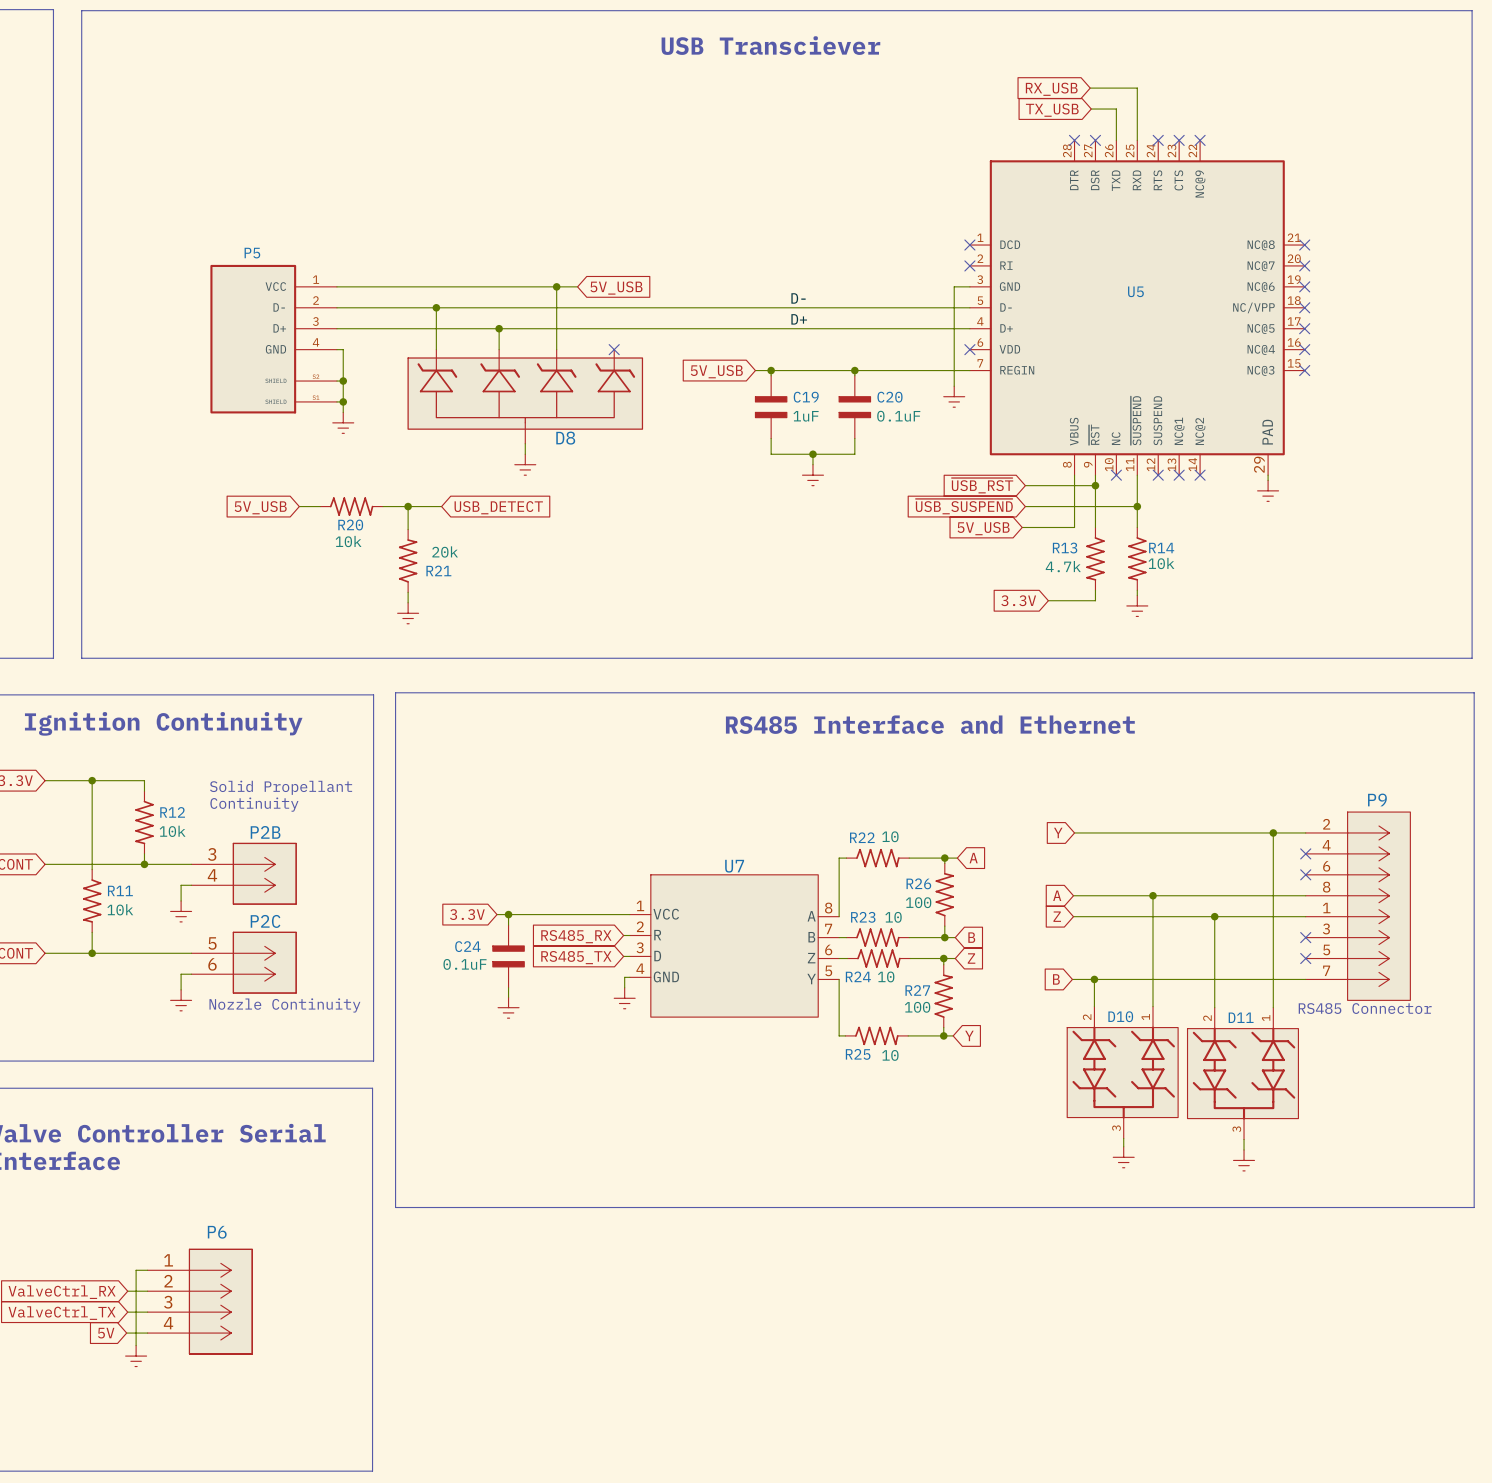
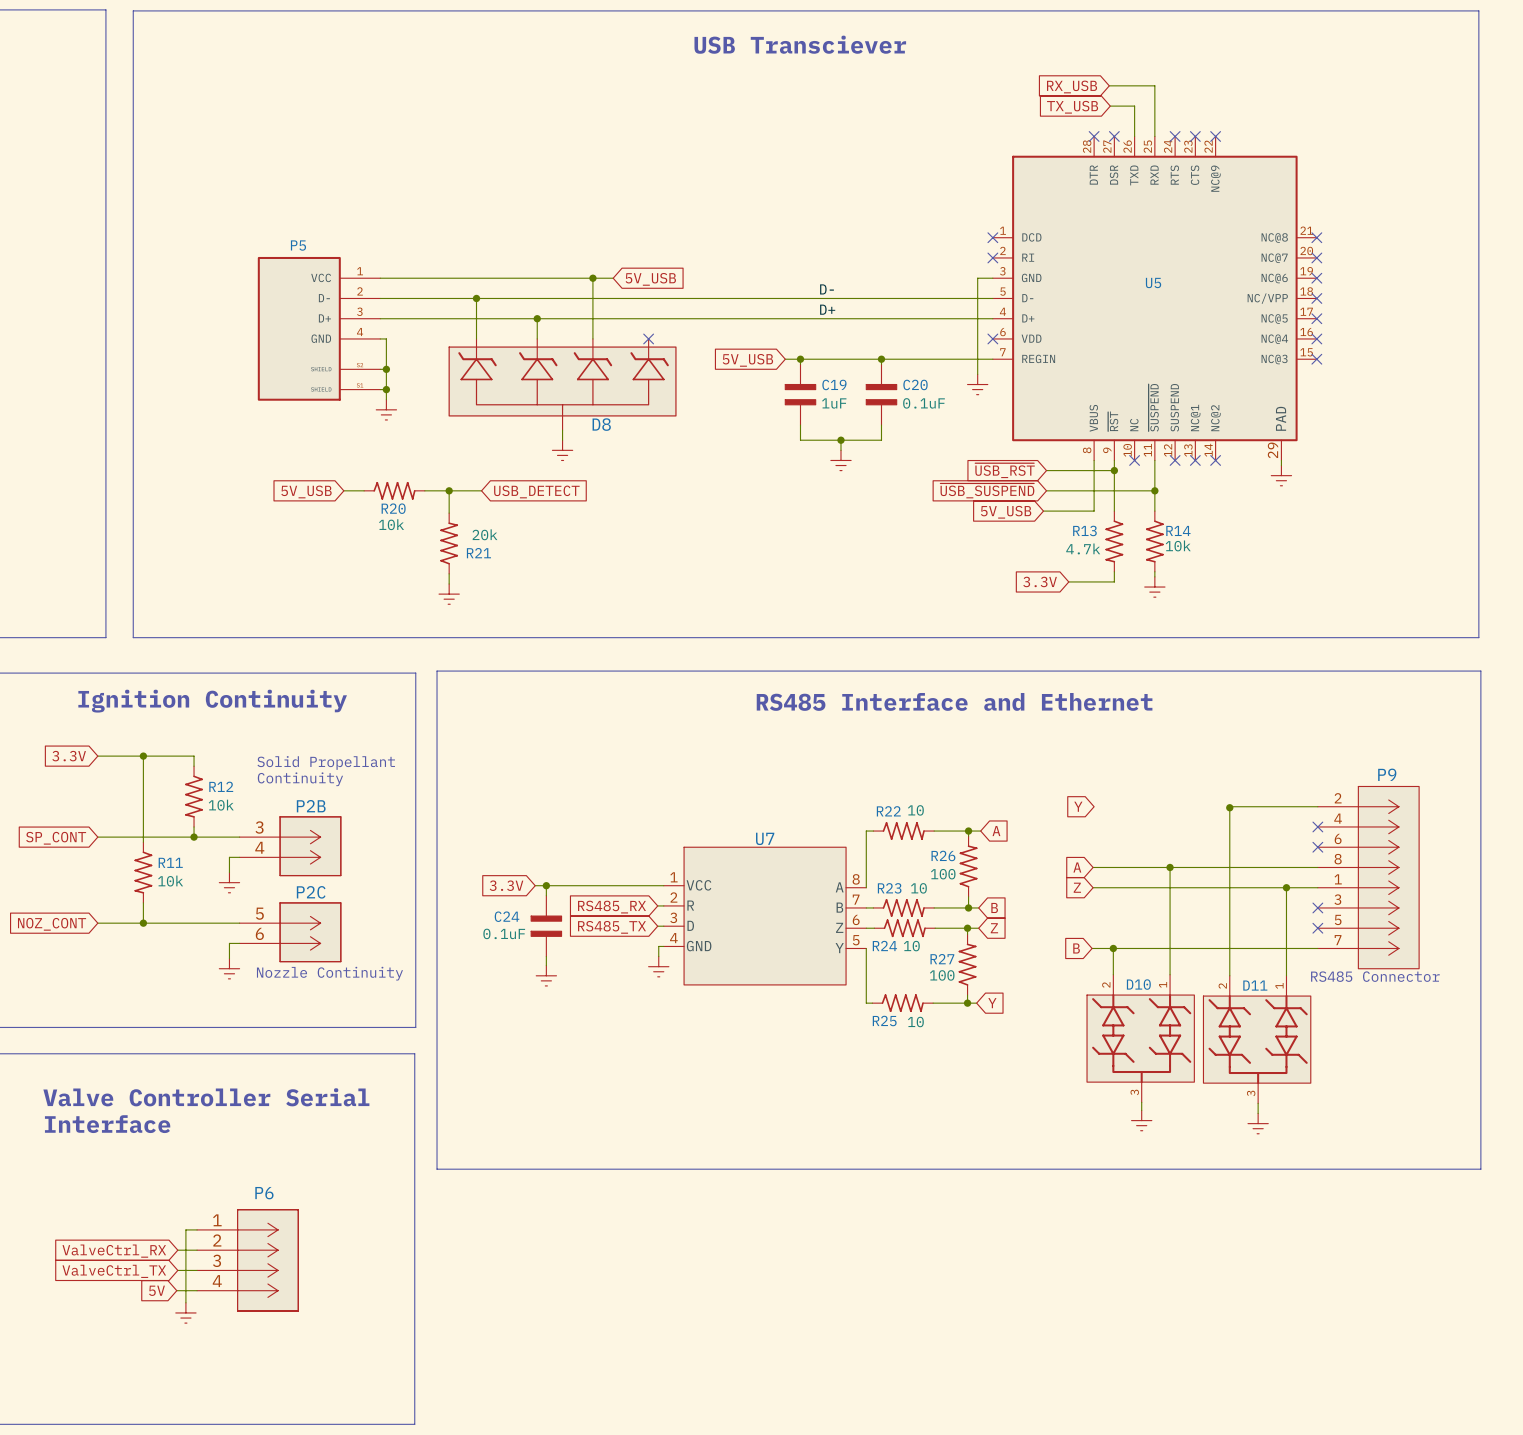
wire: (1074, 832) (1214, 832) -> (1229, 887) (1229, 806)
wire: (1273, 832) (1273, 916) -> none
junction: (1273, 832) -> none
junction: none -> (1229, 807)
junction: (1214, 916) -> none
junction: none -> (1286, 887)

